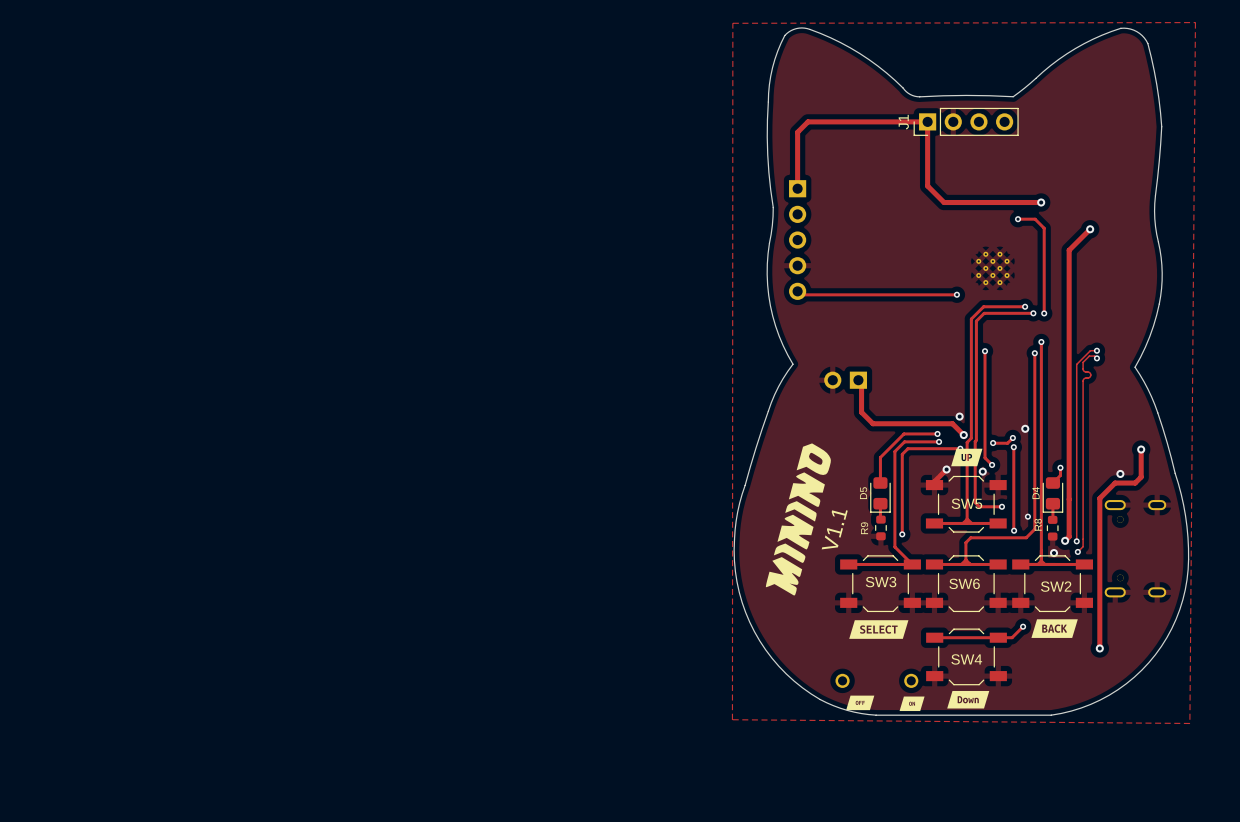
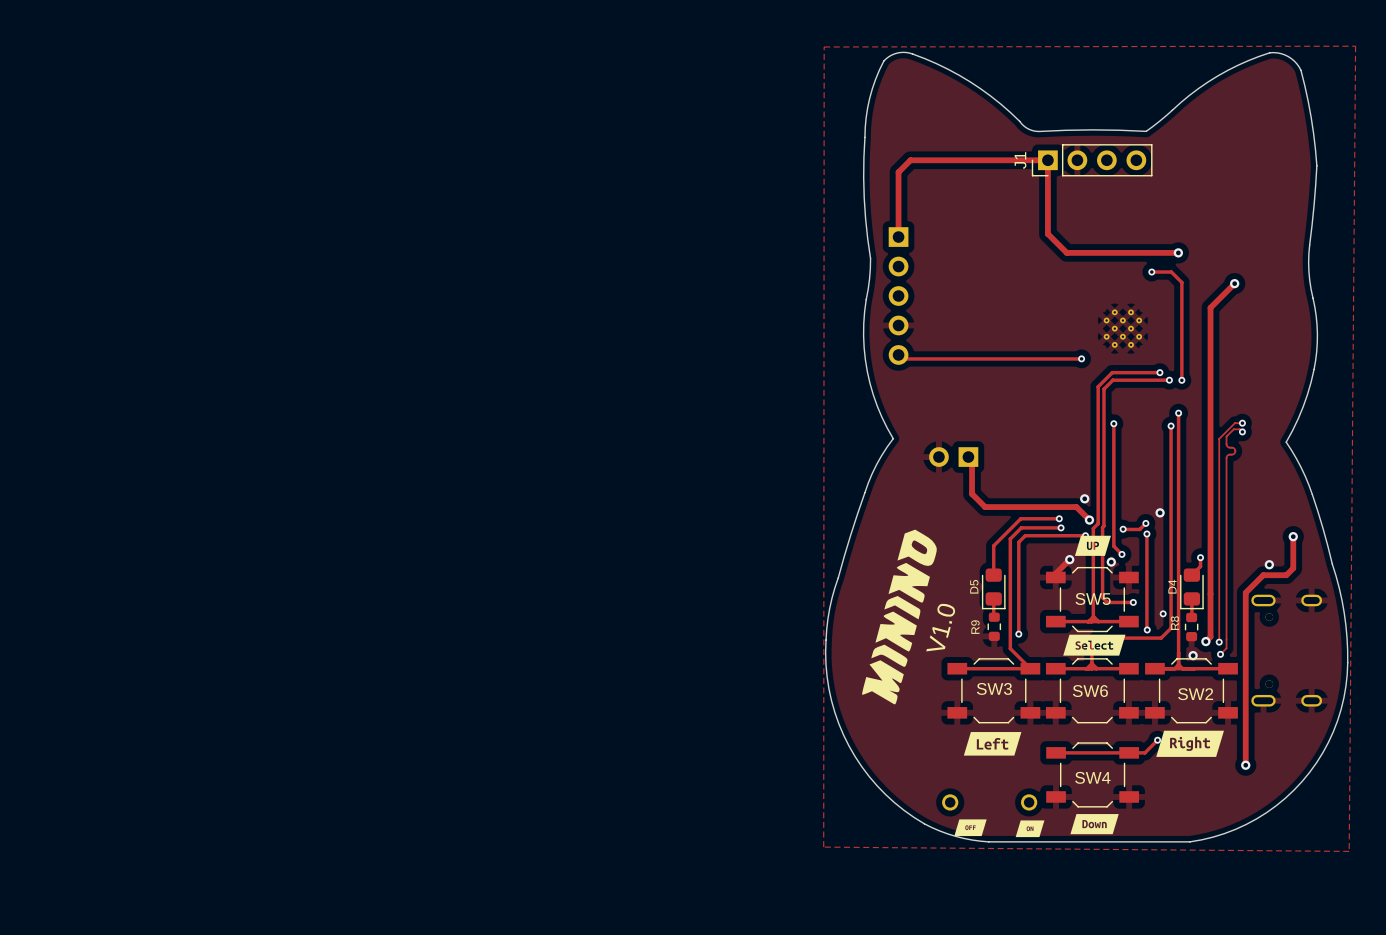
text: V1.1 (834, 529) -> V1.0 (940, 627)
drawing: none -> [1063, 634, 1126, 656]
drawing shape: [1031, 619, 1078, 638] -> [1156, 730, 1224, 757]
drawing shape: [849, 620, 909, 639] -> [963, 732, 1022, 756]

